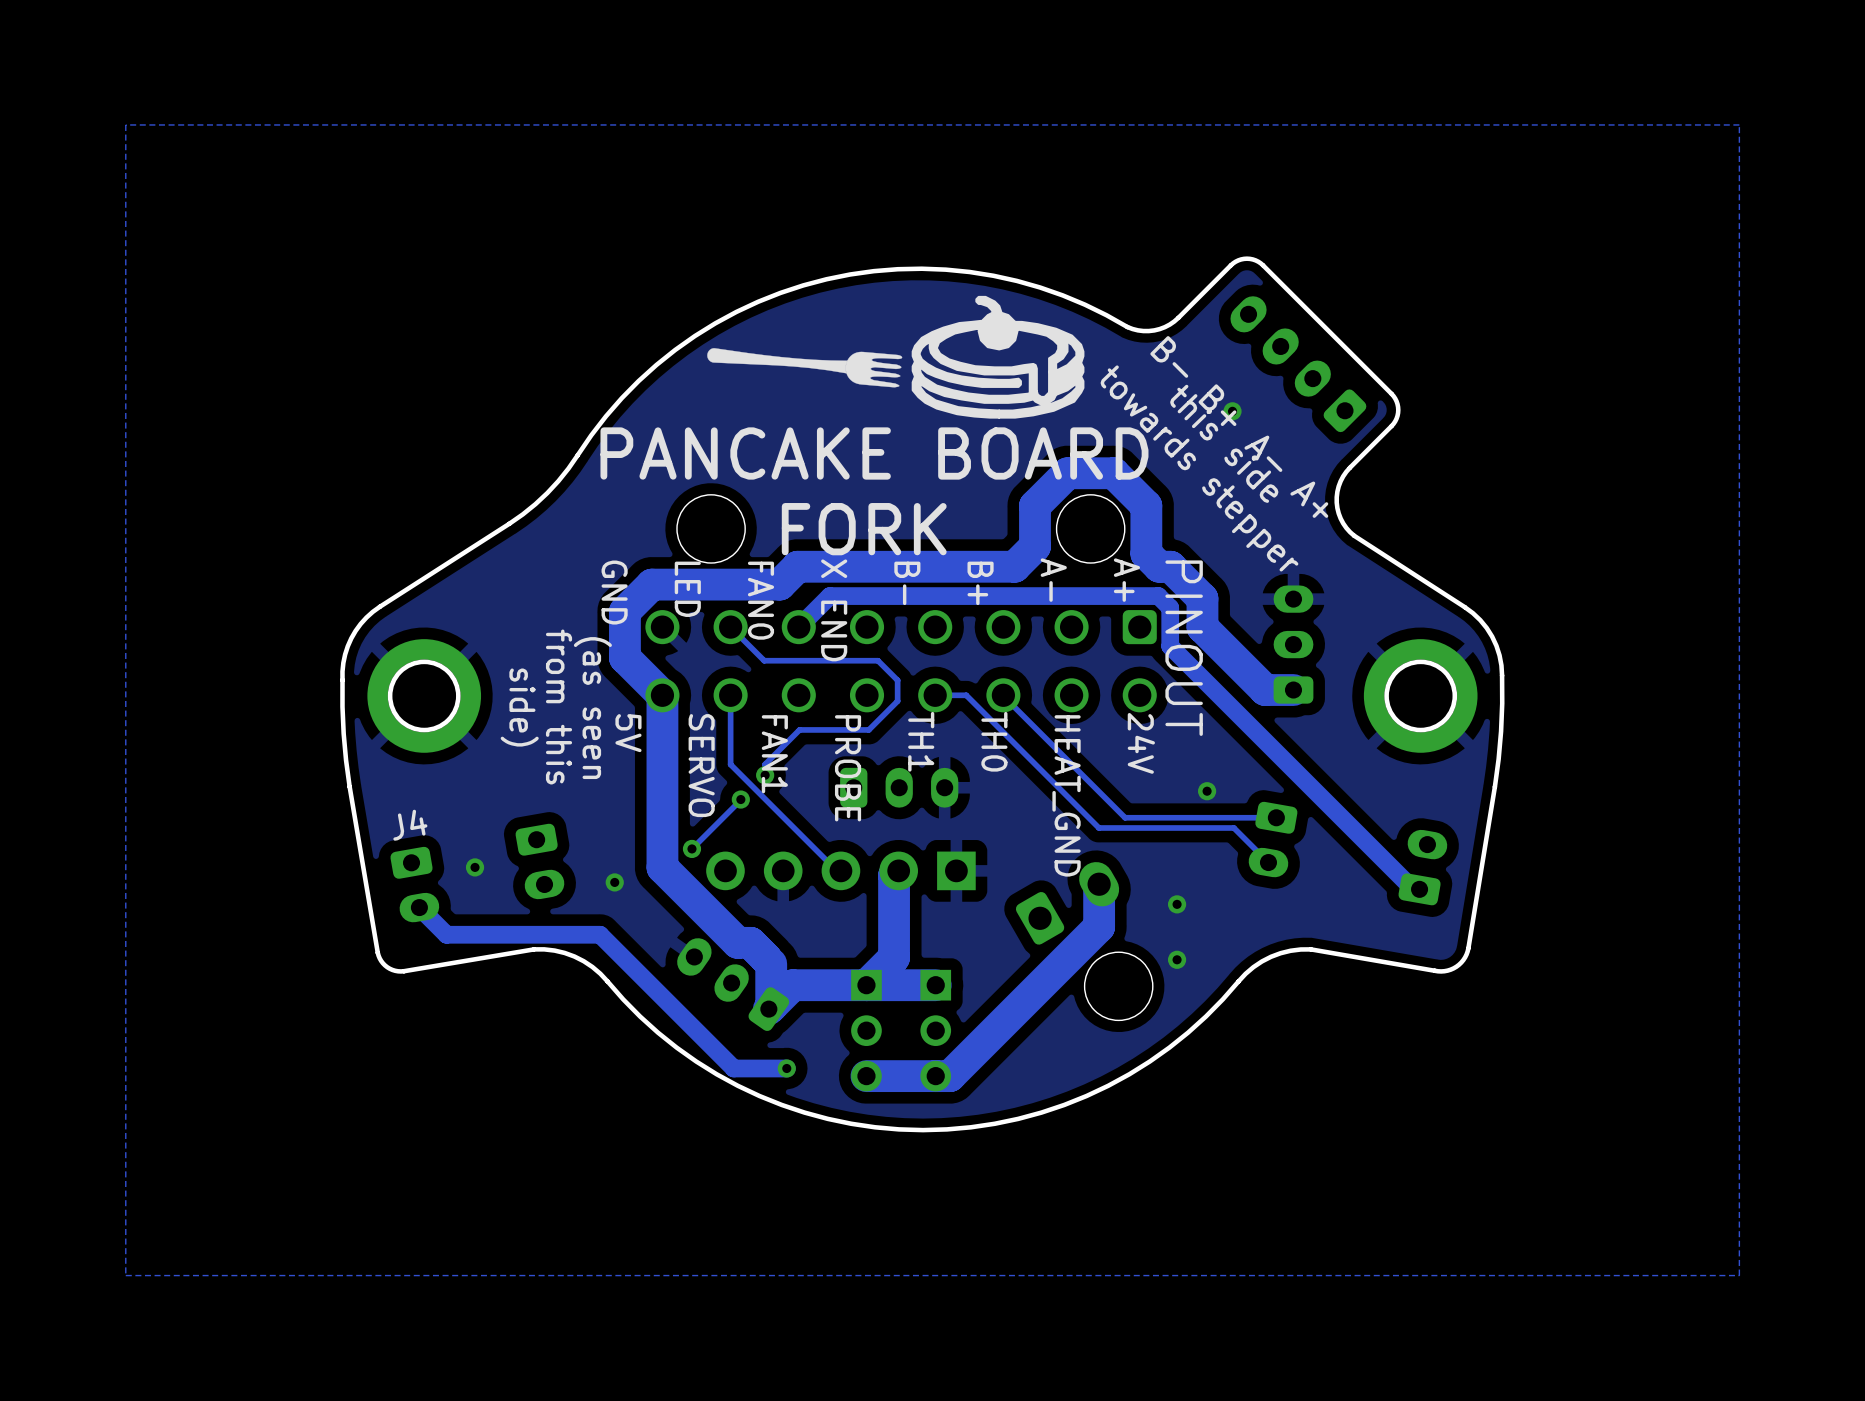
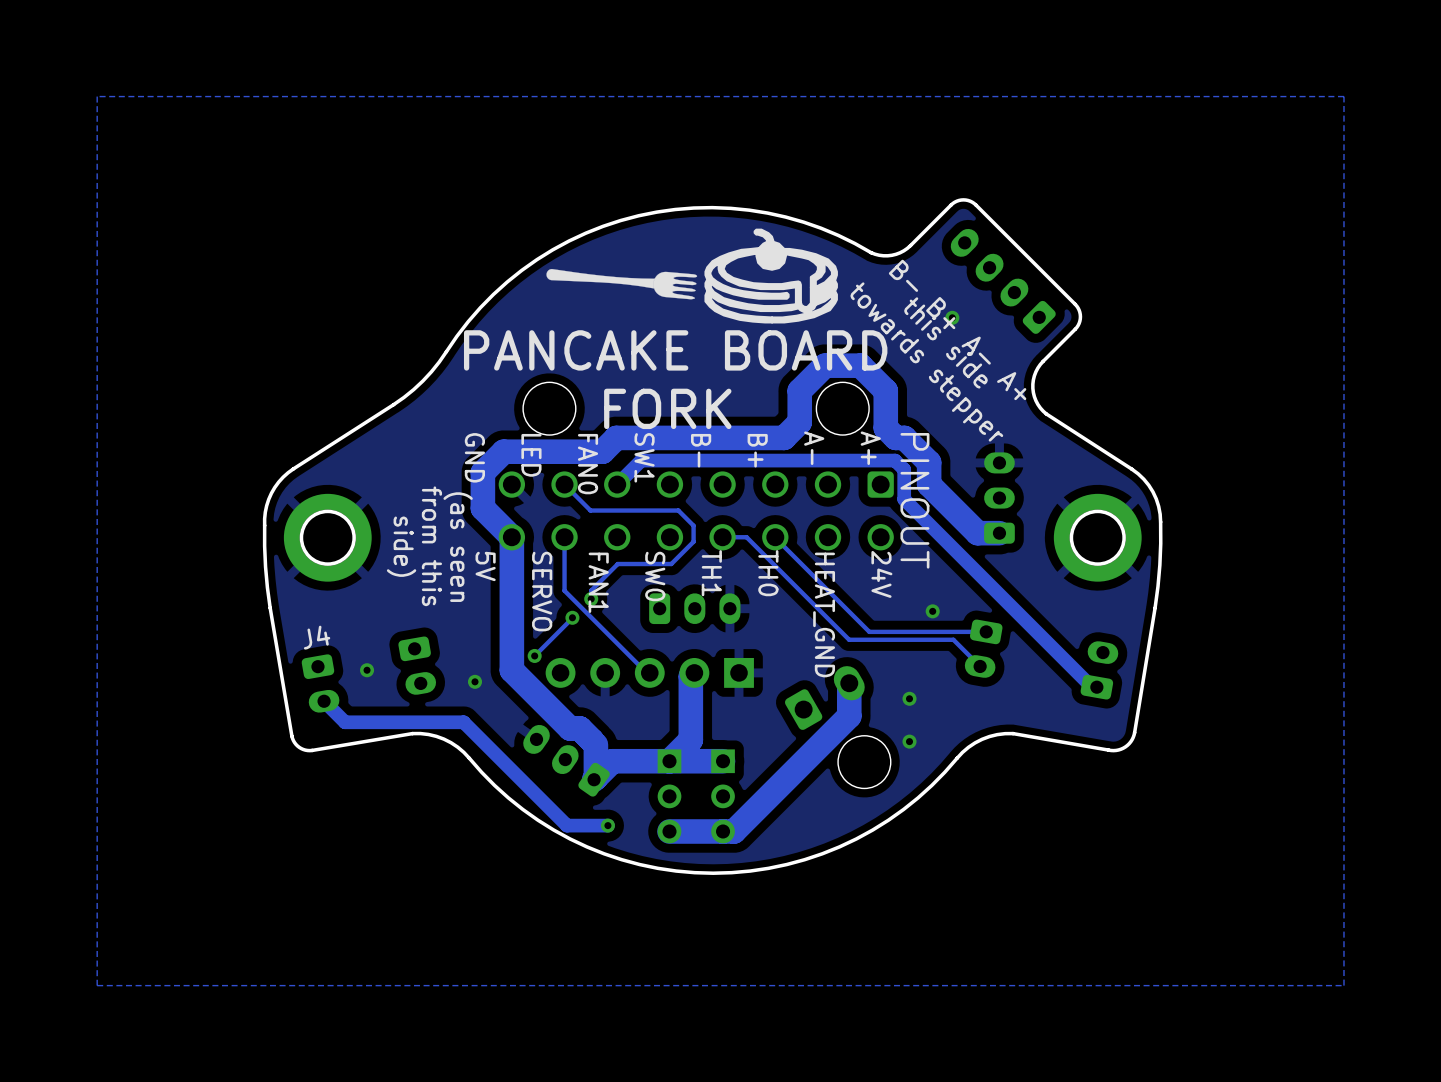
text: X END (834, 610) -> SW1 (644, 457)
text: PROBE (848, 768) -> SW0 (655, 576)

